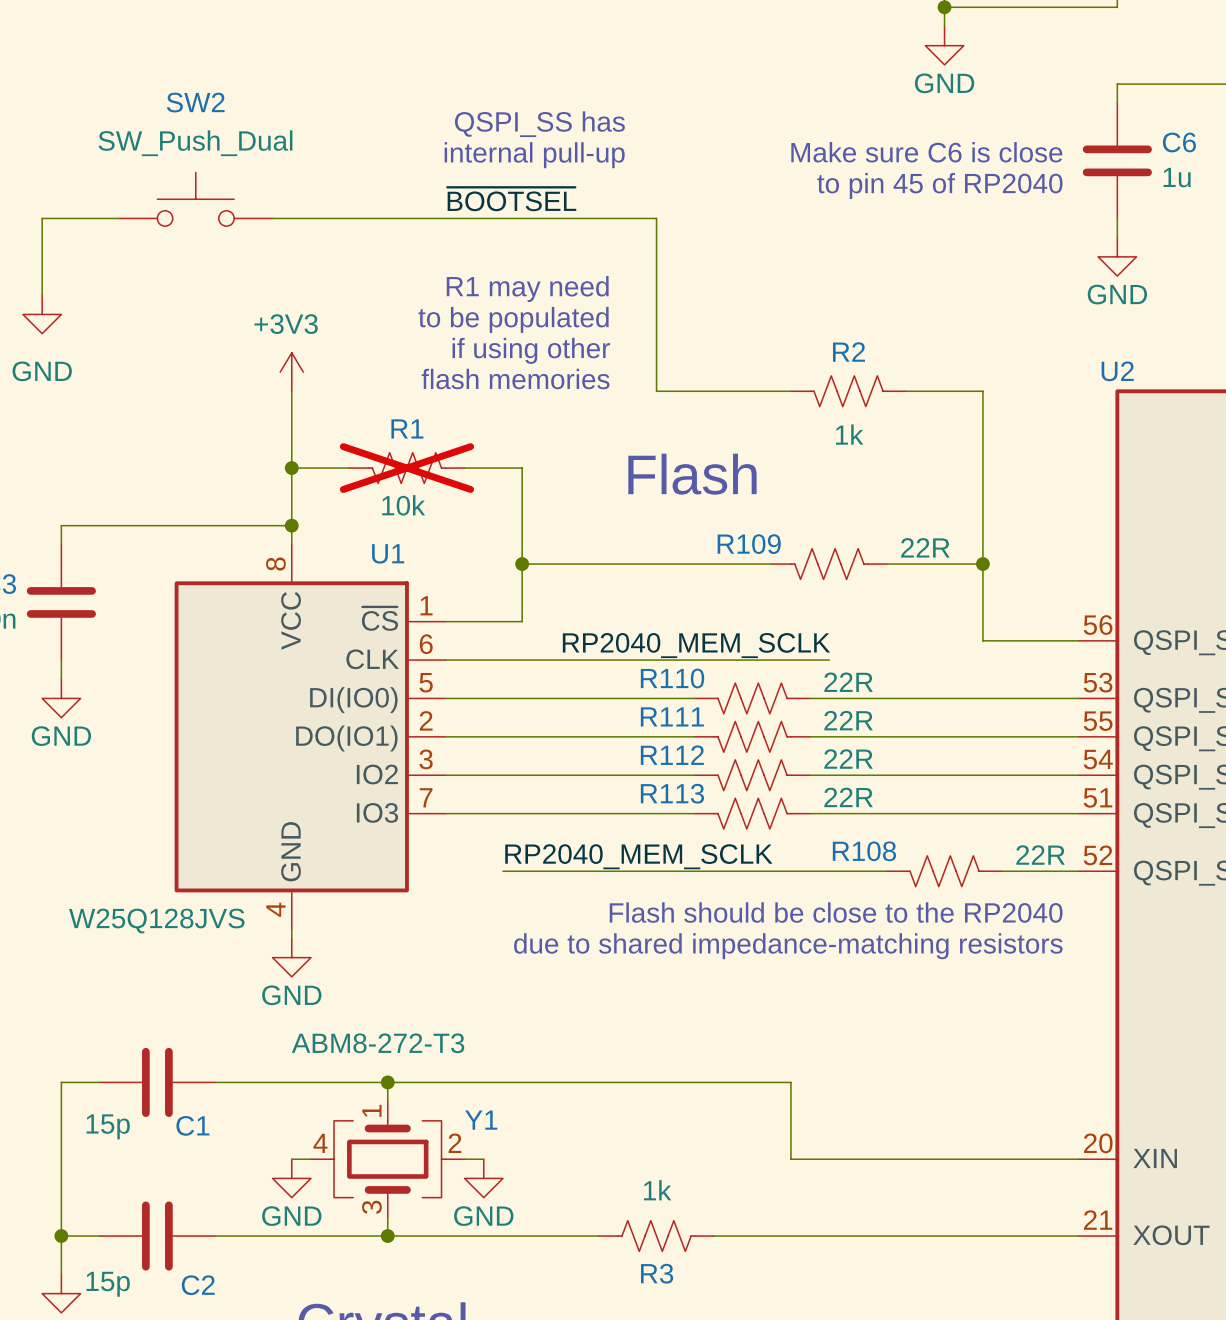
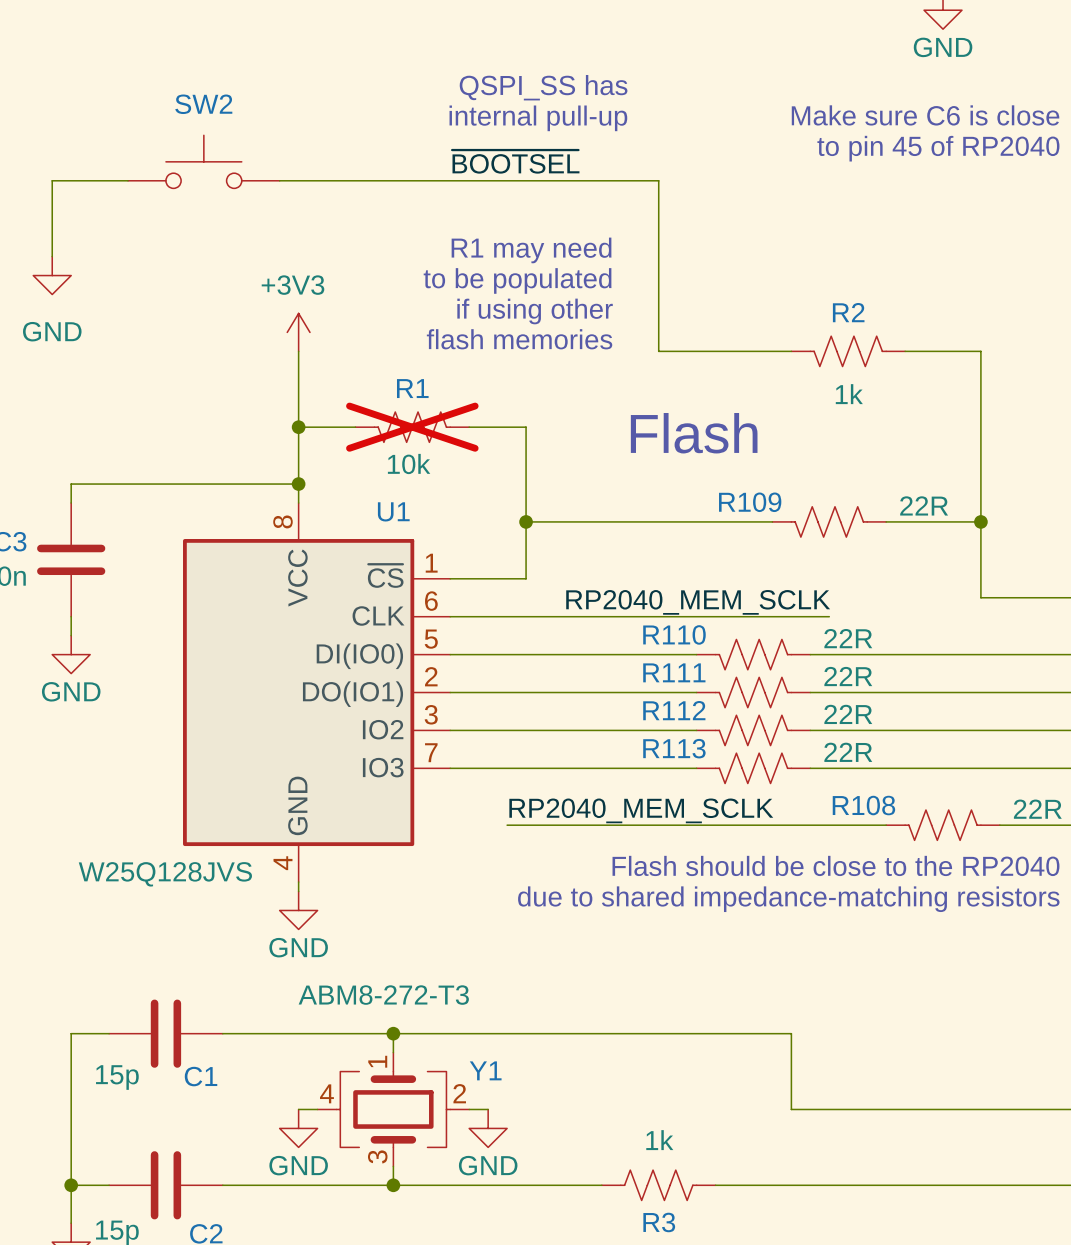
SW2 name position: SW2 (195, 102) -> SW2 (203, 104)
SW2 value: SW_Push_Dual (195, 143) -> none

